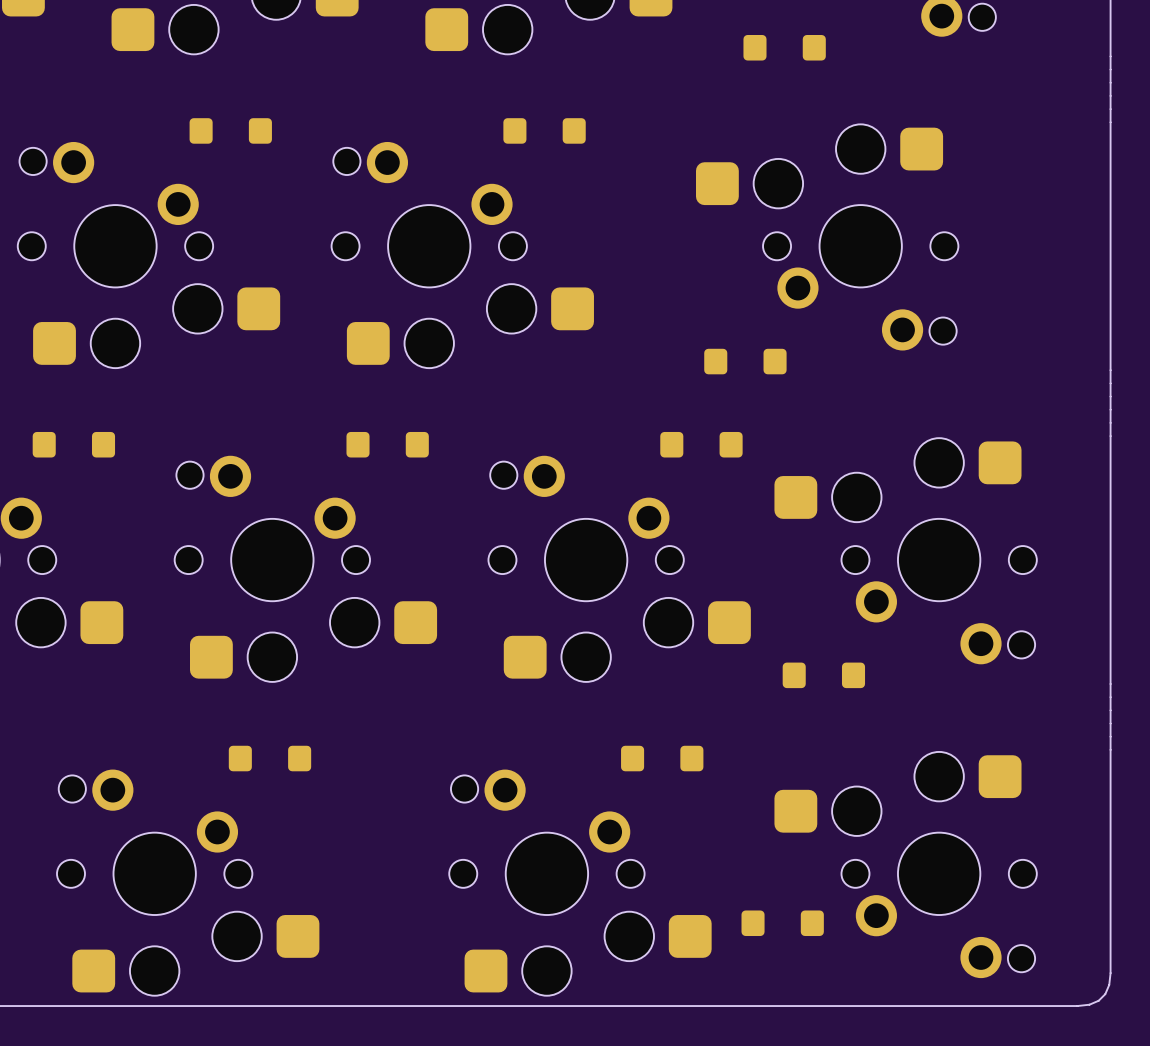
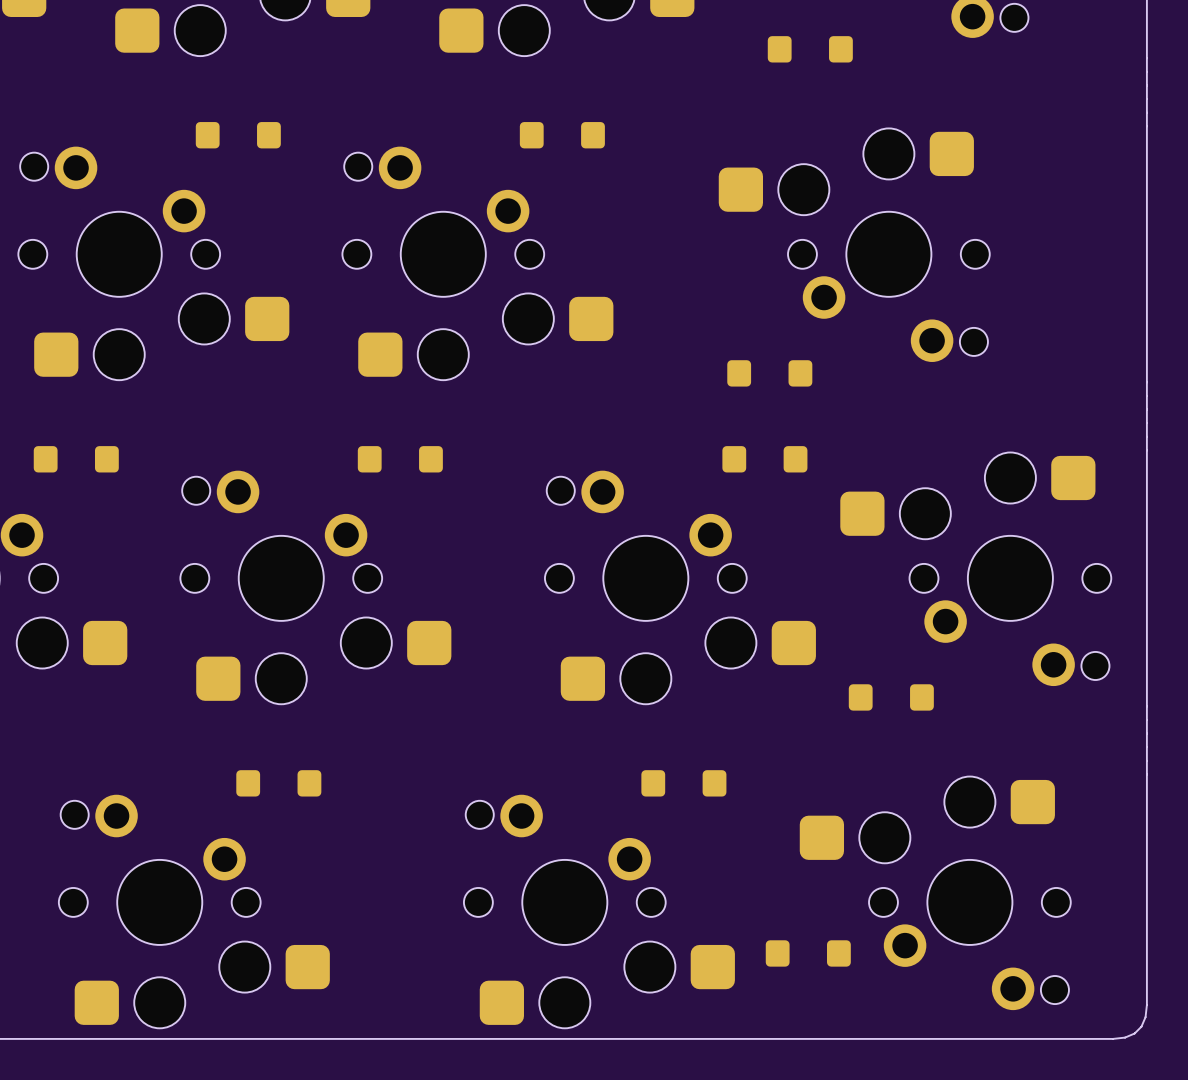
part position: (701, 444) -> (764, 459)
part position: (905, 551) -> (975, 569)
part position: (619, 568) -> (680, 587)
part position: (823, 675) -> (891, 697)

